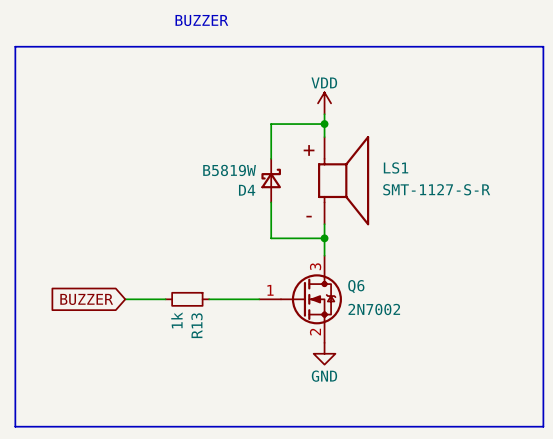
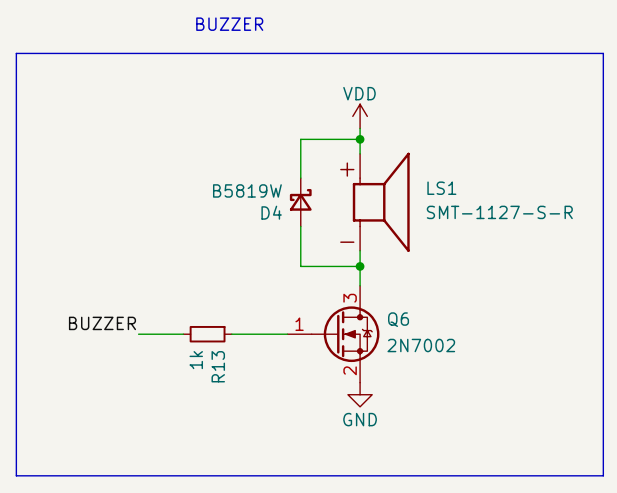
label: none -> BUZZER (102, 323)
global label: BUZZER (86, 299) -> none

